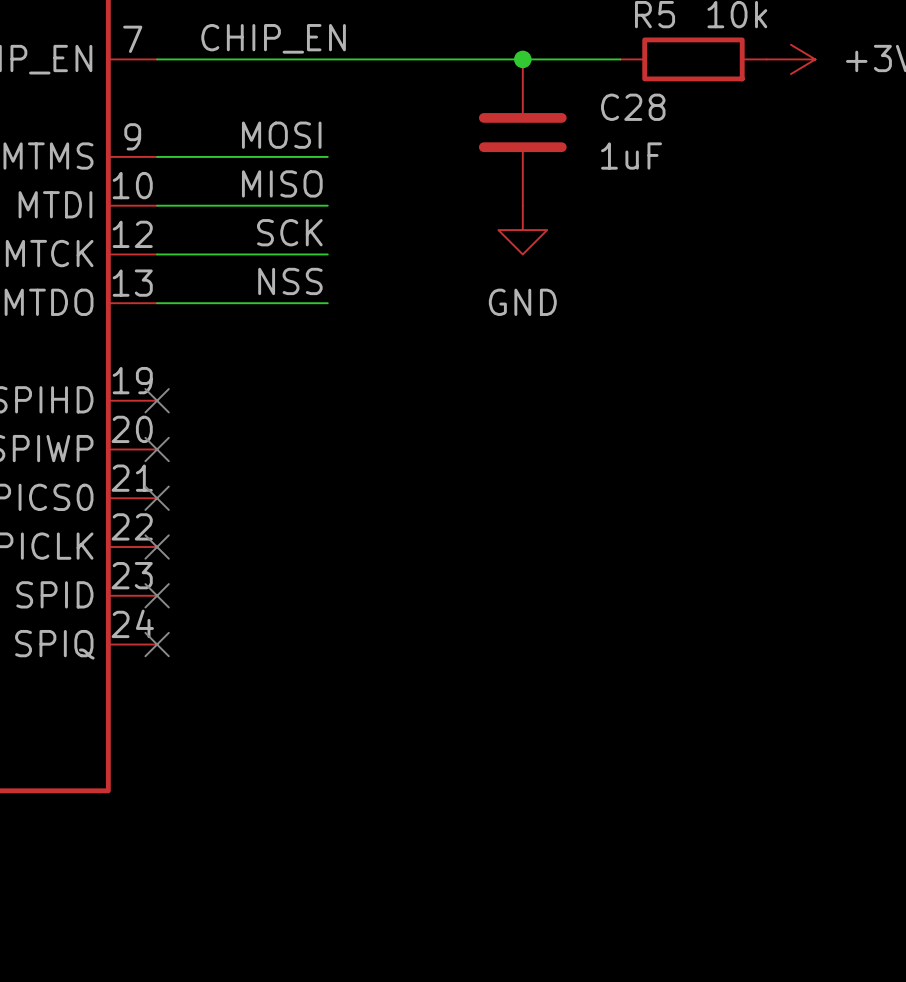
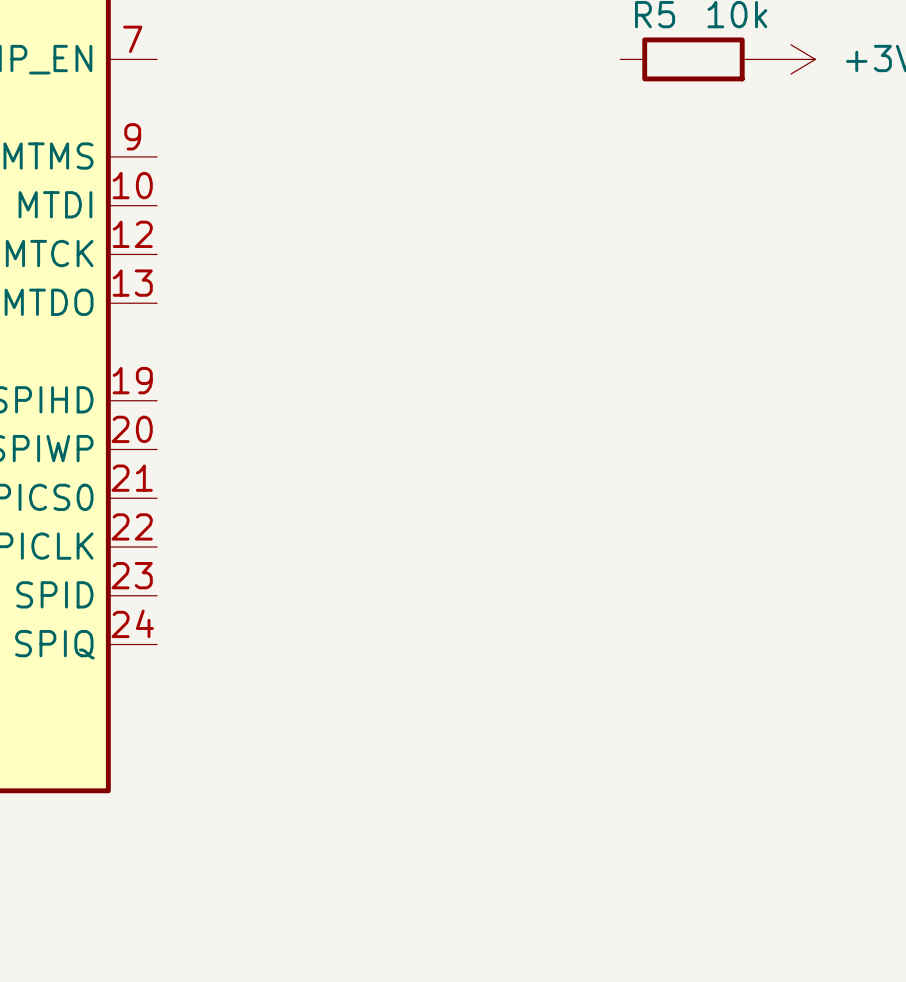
label: CHIP_EN (273, 38) -> none
wire: (157, 59) (620, 59) -> none
junction: (522, 59) -> none
C28: 1uF (522, 132) -> none
label: MOSI (281, 135) -> none
wire: (157, 156) (327, 156) -> none
label: MISO (282, 183) -> none
wire: (157, 205) (327, 205) -> none
power symbol: GND (522, 230) -> none
label: SCK (289, 232) -> none
wire: (157, 254) (327, 254) -> none
label: NSS (290, 281) -> none
wire: (157, 303) (327, 303) -> none
no-connect mark: (157, 400) -> none
no-connect mark: (157, 449) -> none
no-connect mark: (157, 498) -> none
no-connect mark: (157, 547) -> none
no-connect mark: (157, 595) -> none
no-connect mark: (157, 644) -> none

